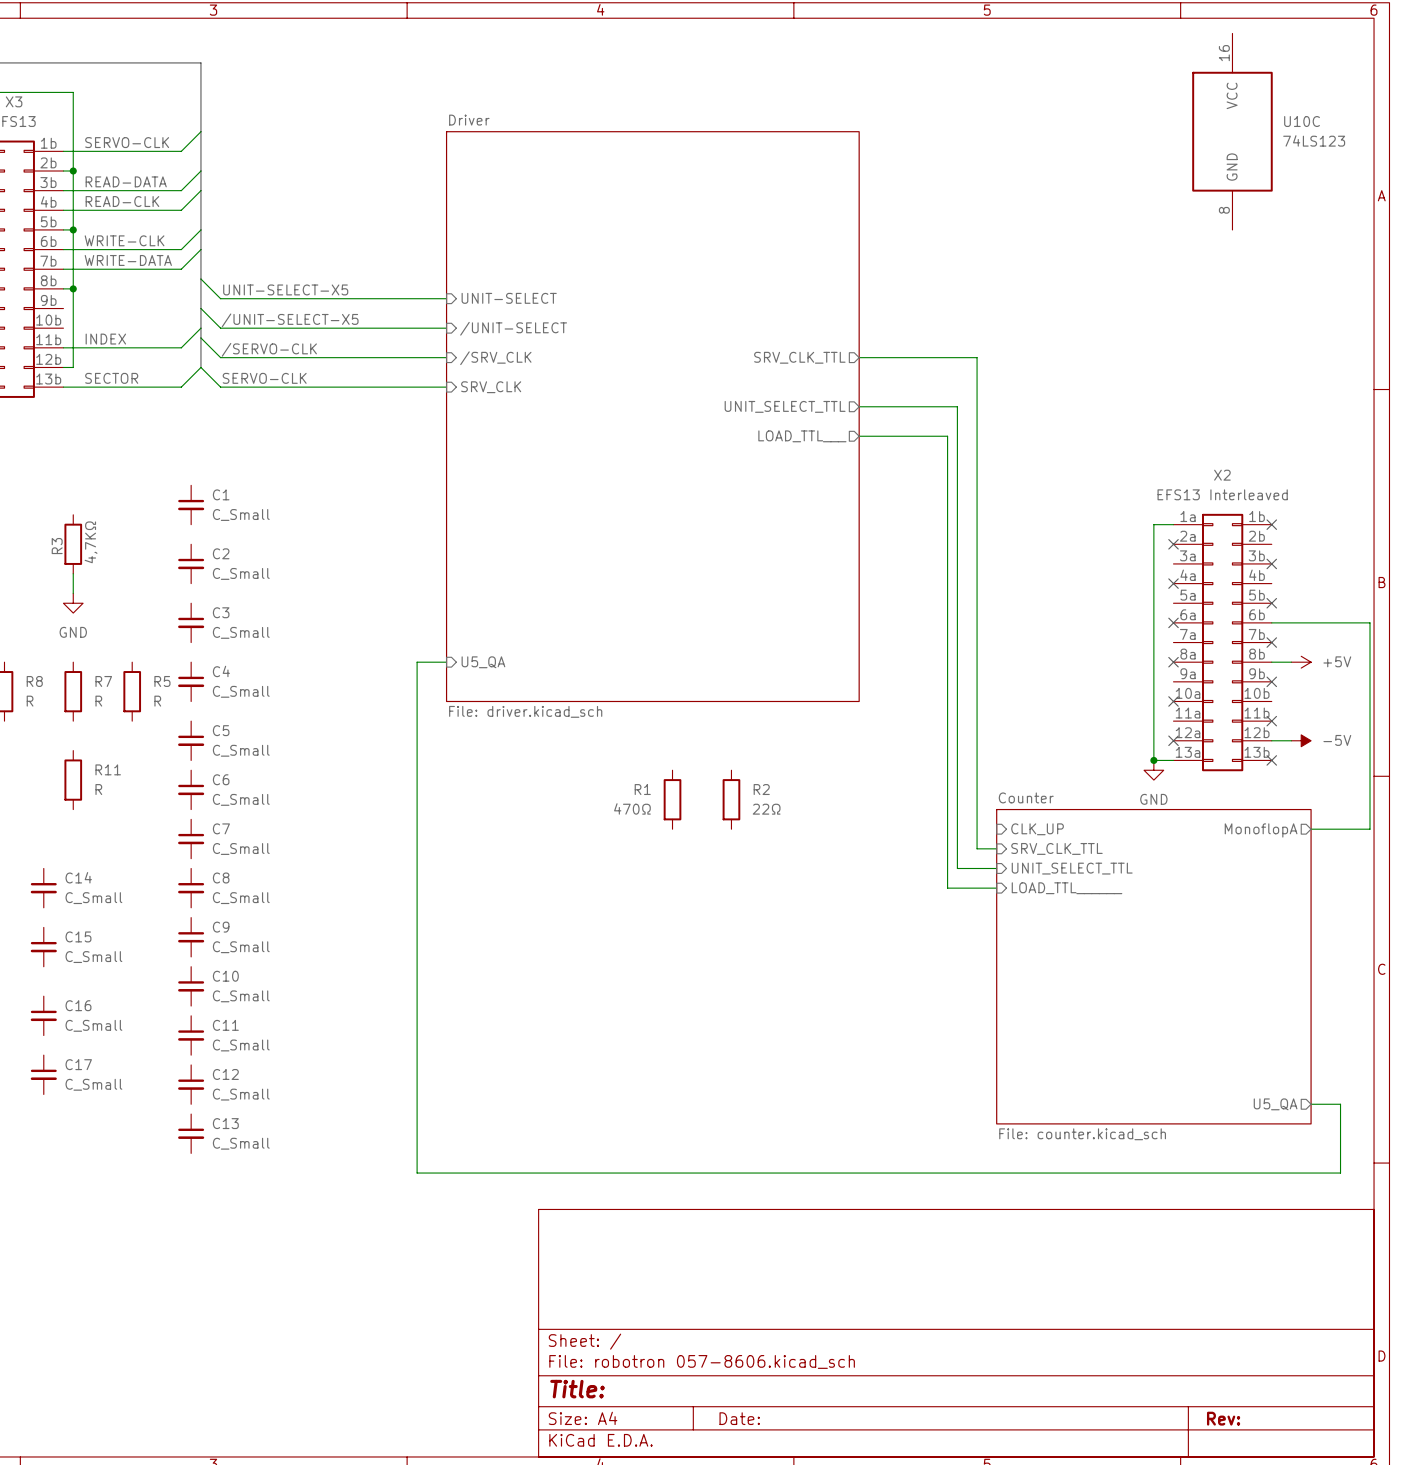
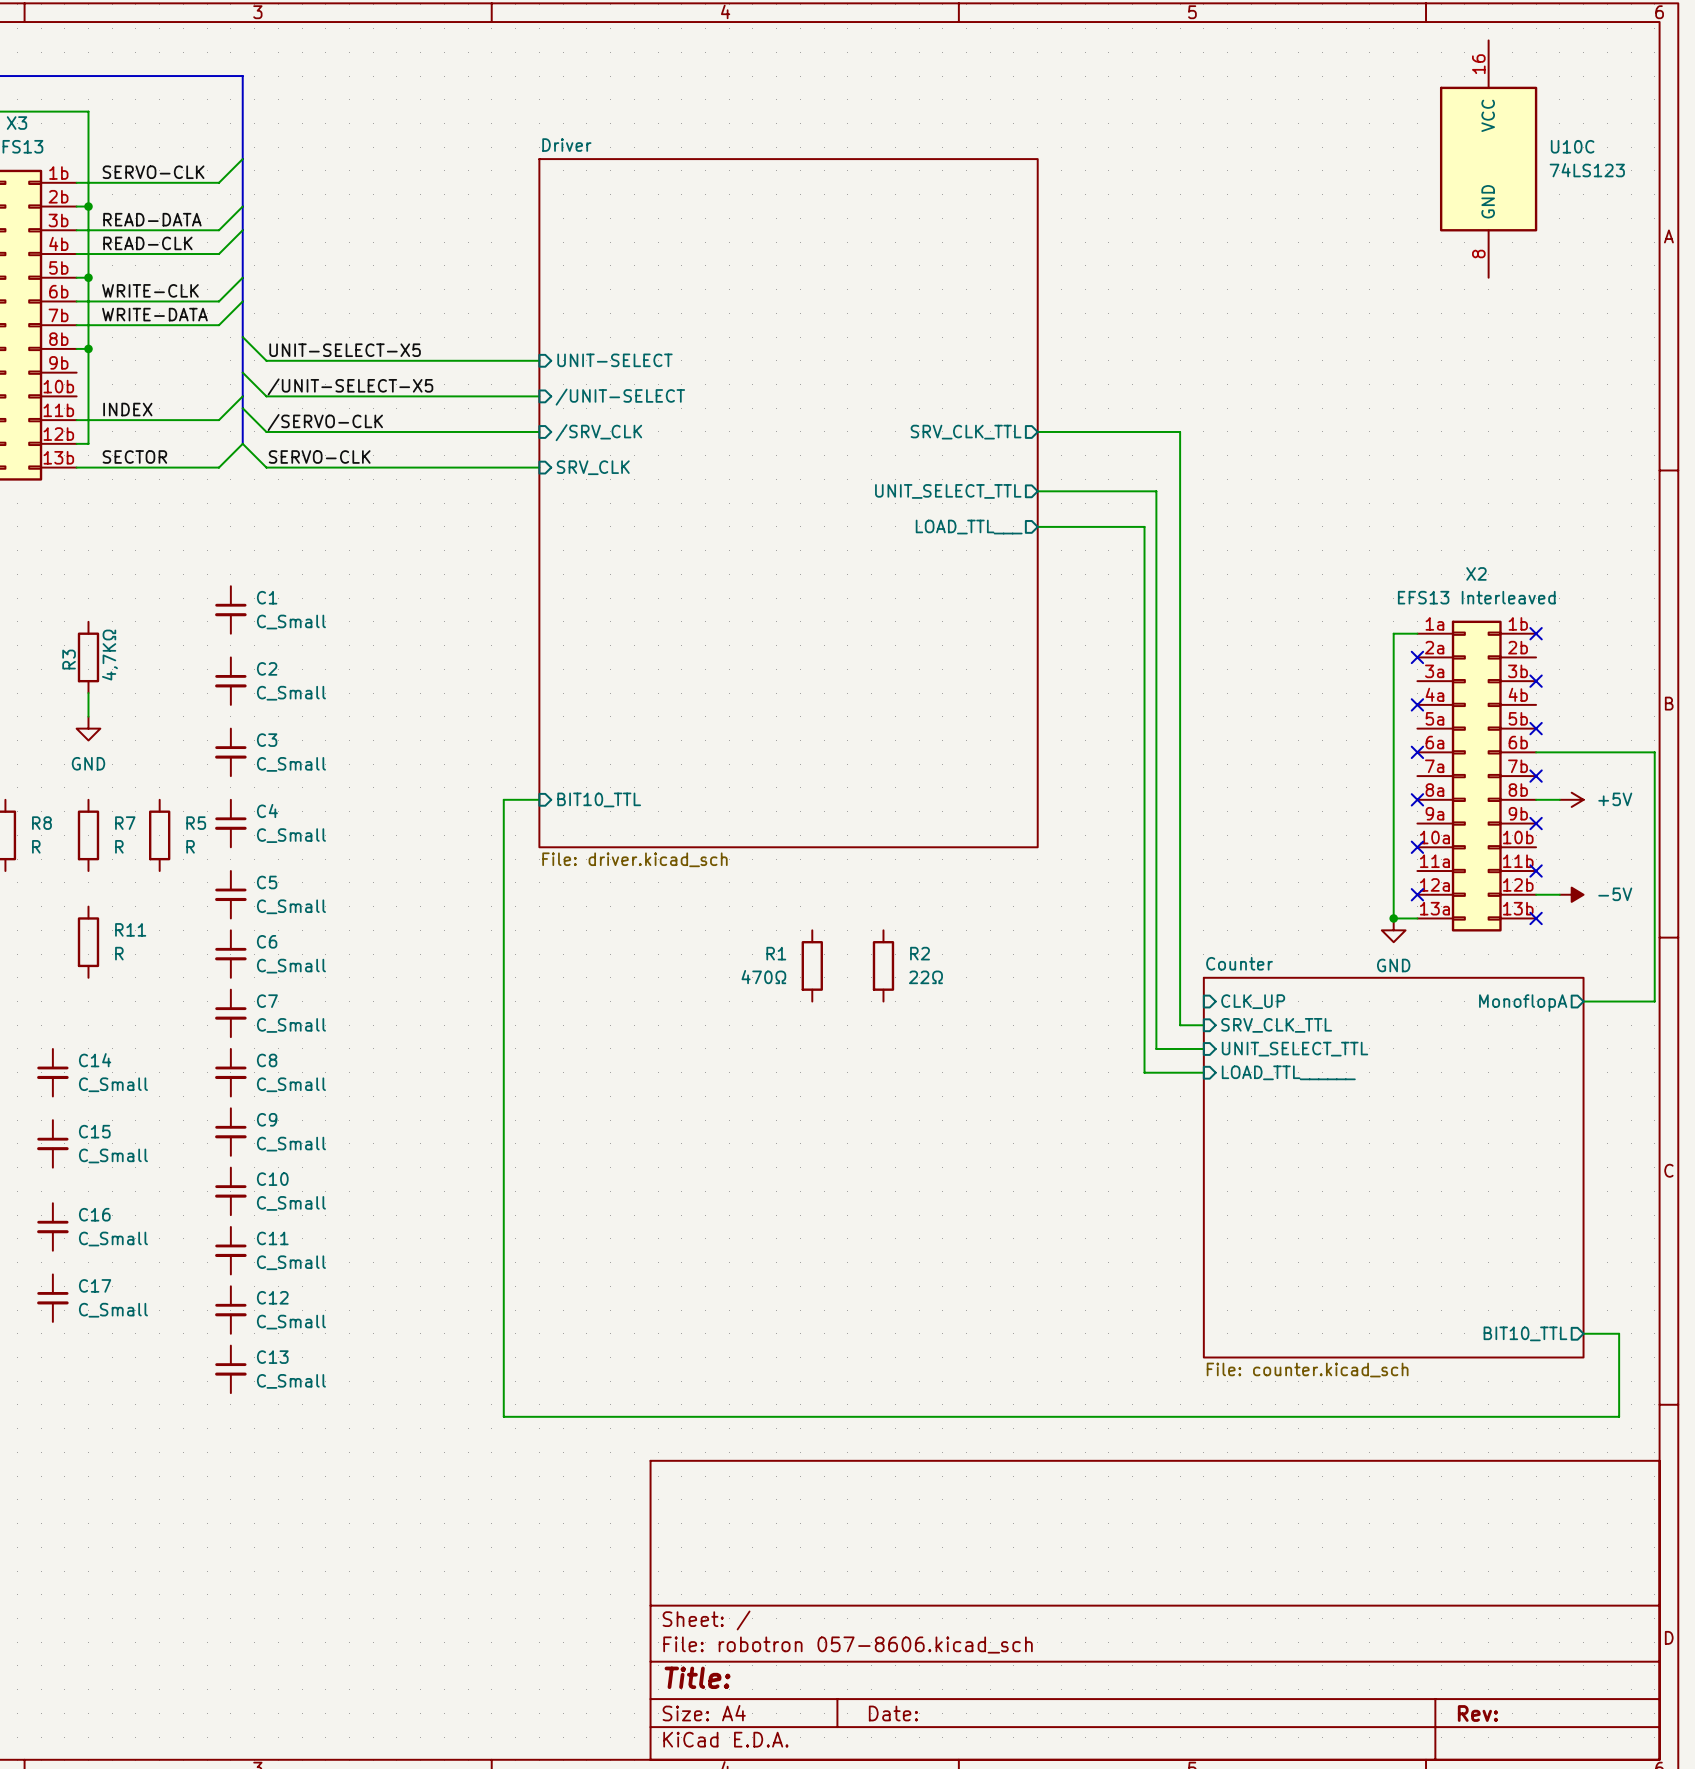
sheet pin: U5_QA (483, 662) -> BIT10_TTL (599, 799)
sheet pin: U5_QA (1275, 1104) -> BIT10_TTL (1525, 1333)

